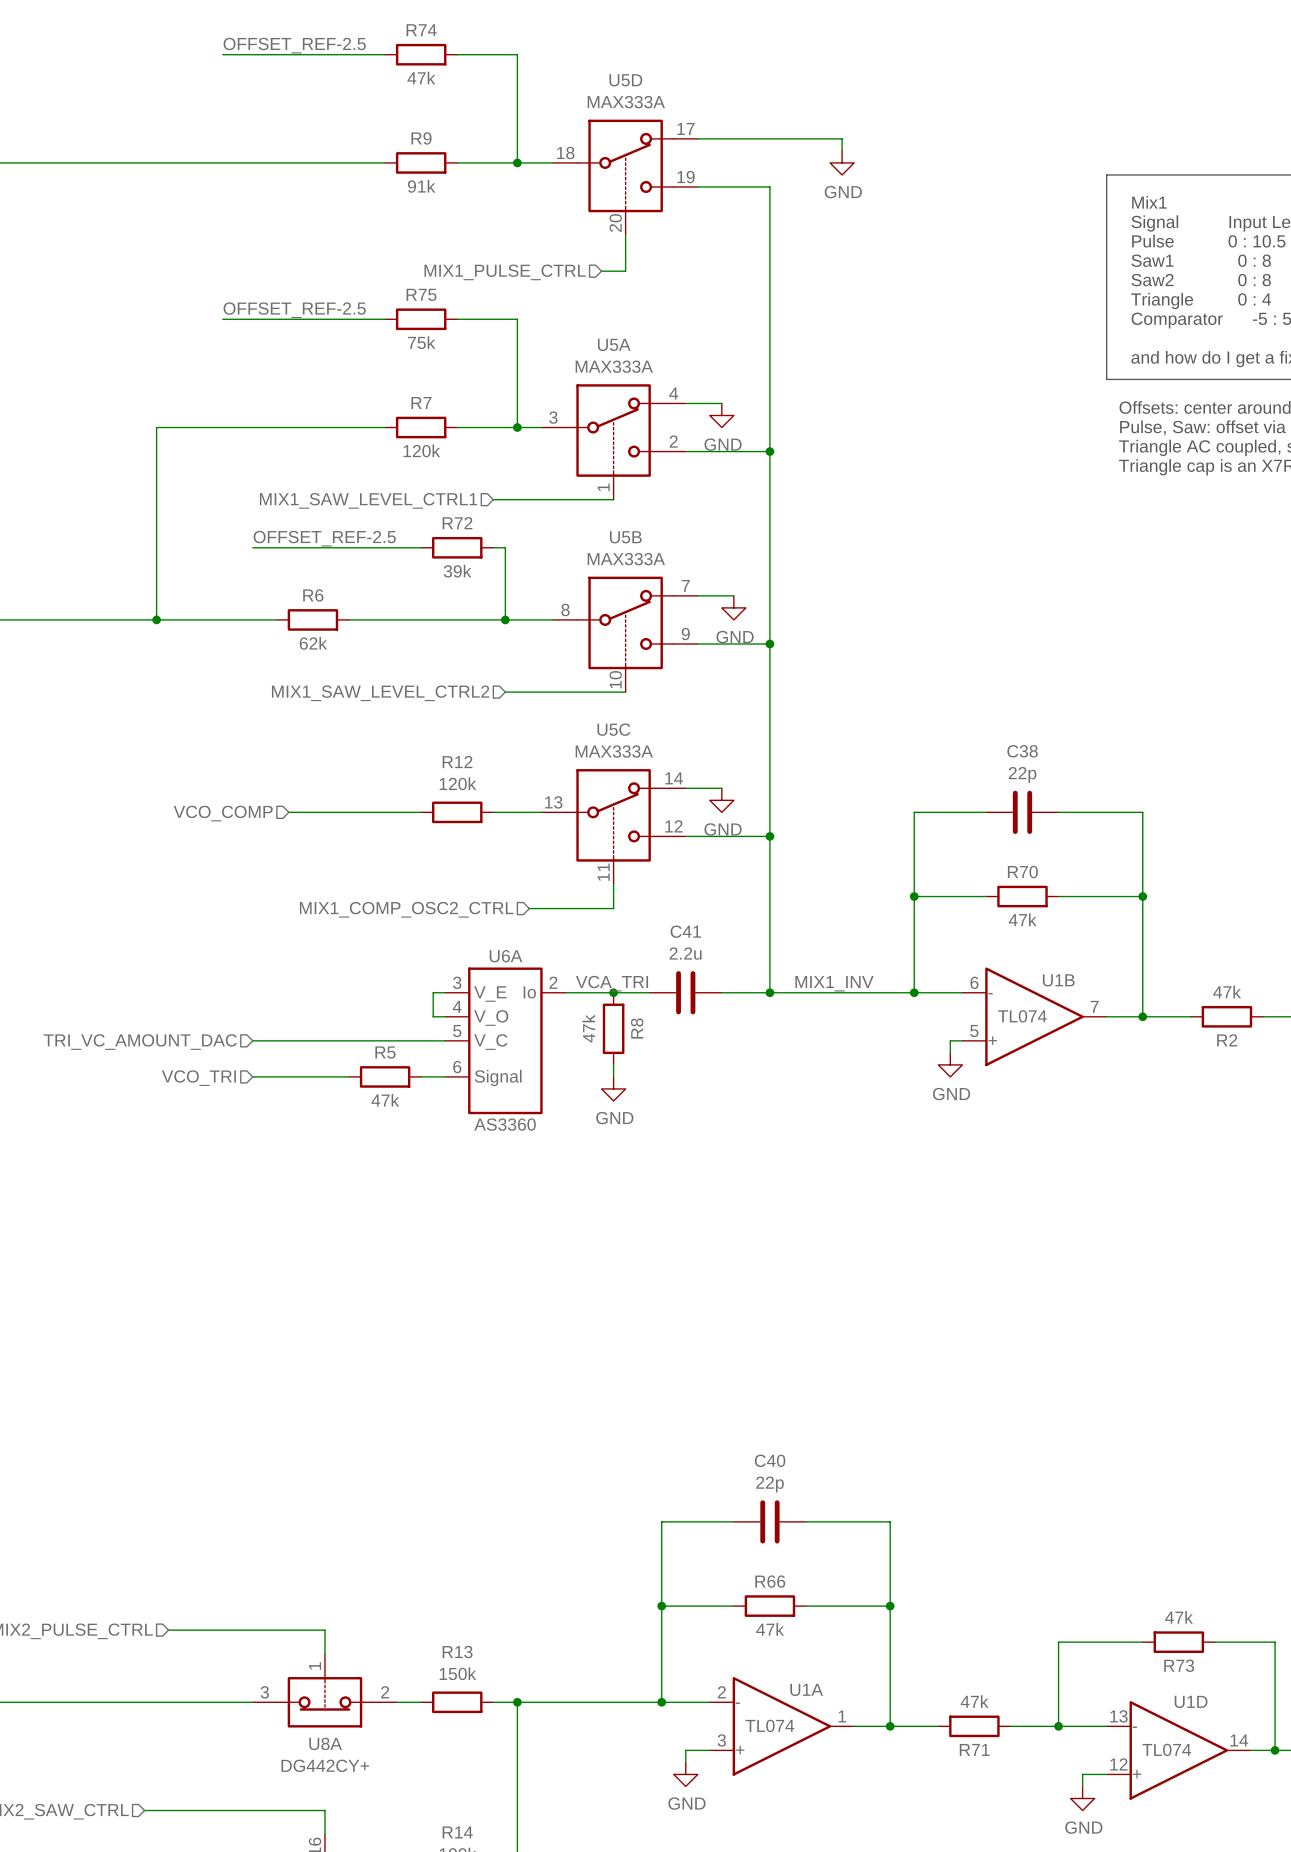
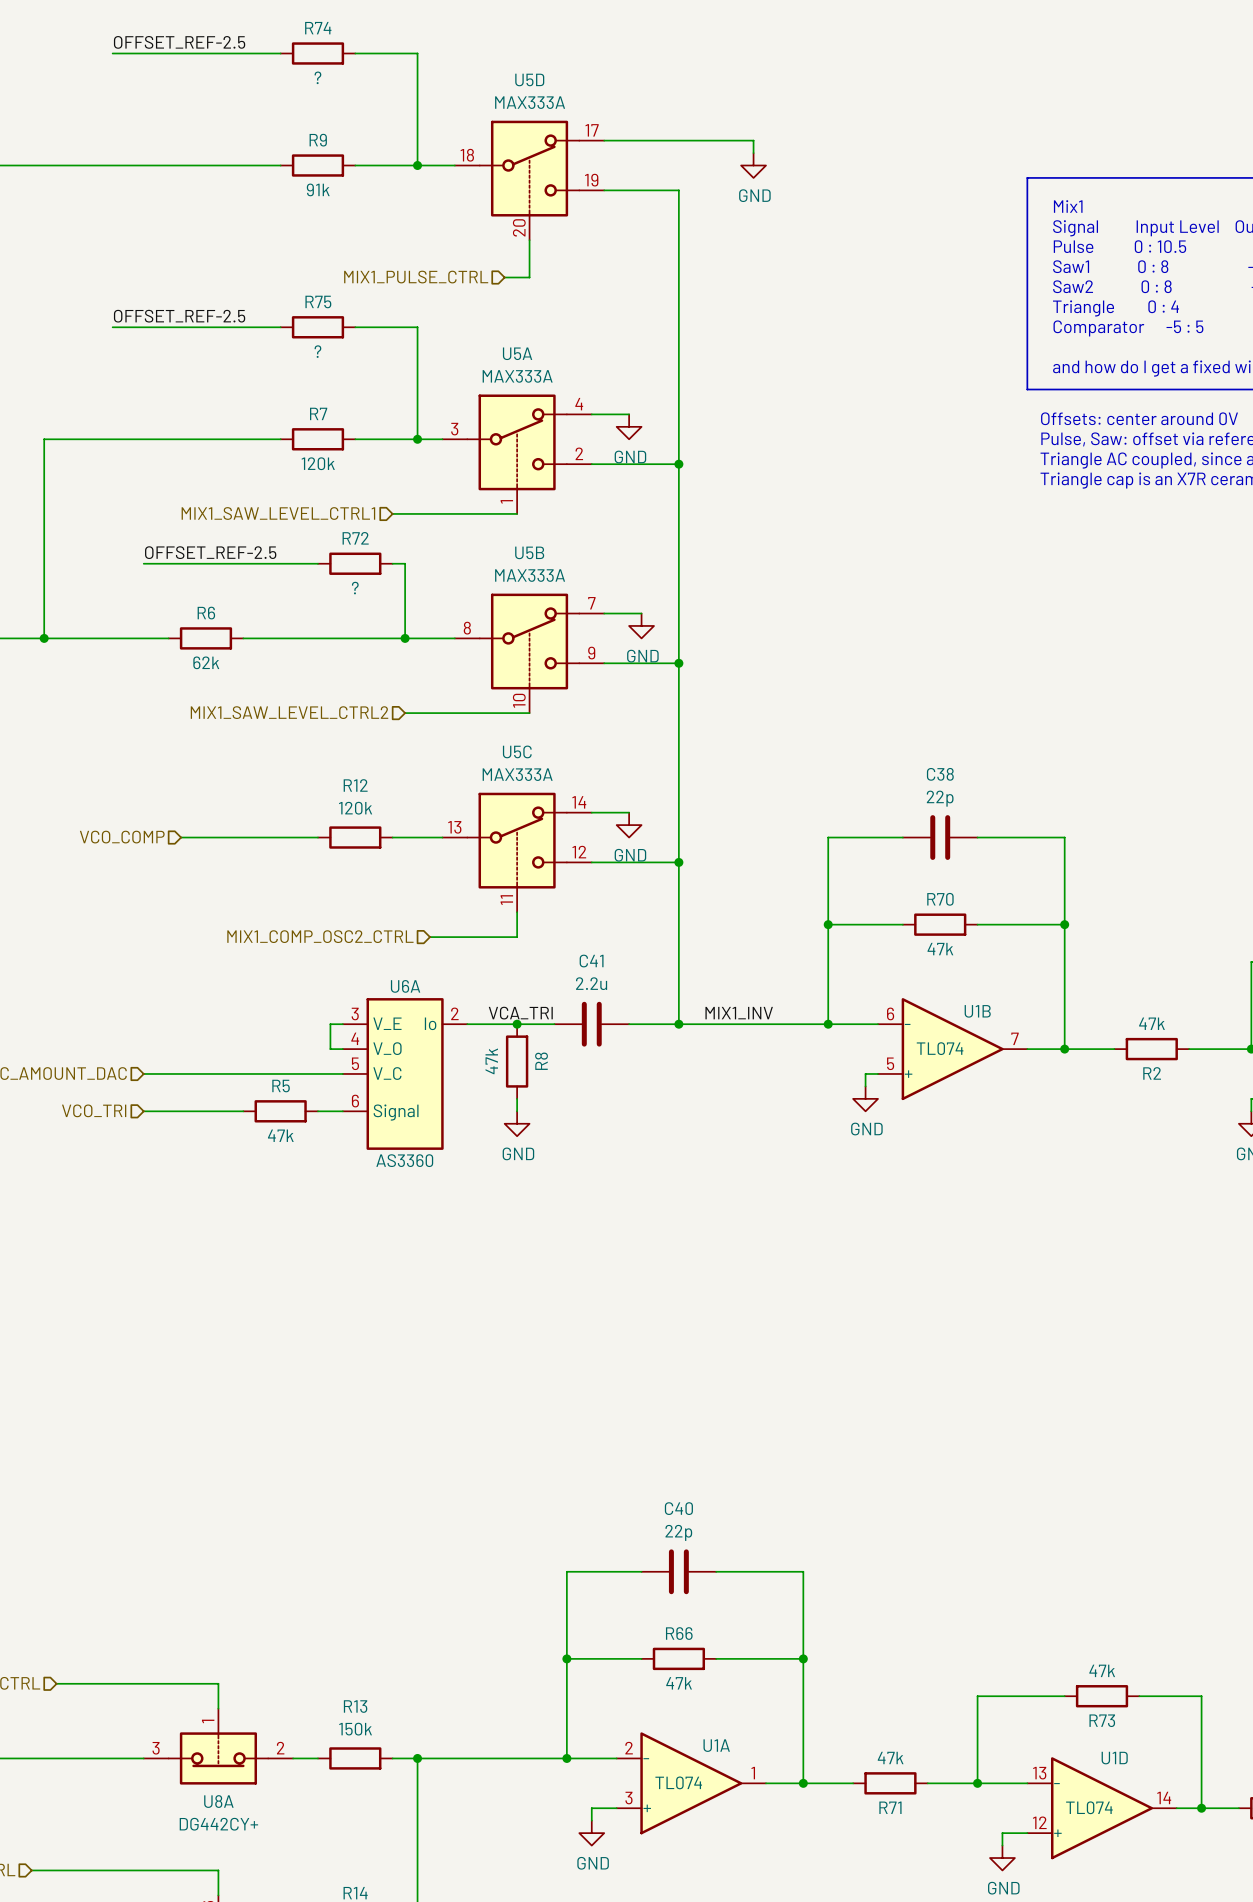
R74 value: 47k (421, 77) -> ? (317, 77)
R75 value: 75k (421, 342) -> ? (317, 351)
R72 value: 39k (457, 571) -> ? (355, 588)

